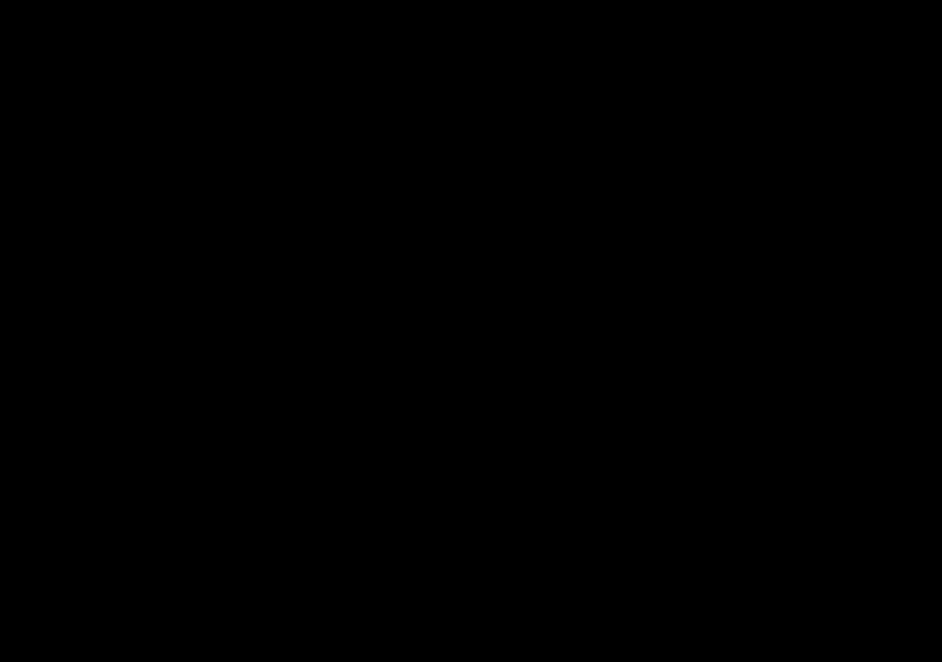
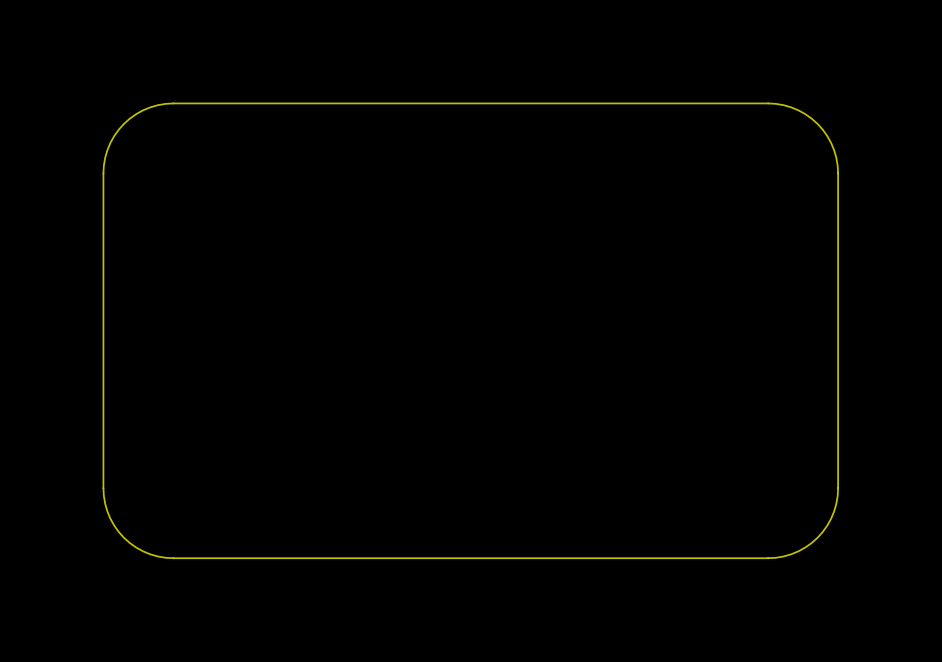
board edge: none -> (768, 103) (173, 103) (157, 105) (136, 114) (123, 123) (114, 136) (107, 150) (103, 173) (103, 488) (107, 511) (114, 525) (123, 537) (143, 551) (157, 556) (173, 558) (768, 558) (791, 554) (805, 547) (817, 537) (827, 525) (834, 511) (837, 496) (837, 165) (831, 143) (817, 123) (798, 110) (783, 105) (768, 103)

